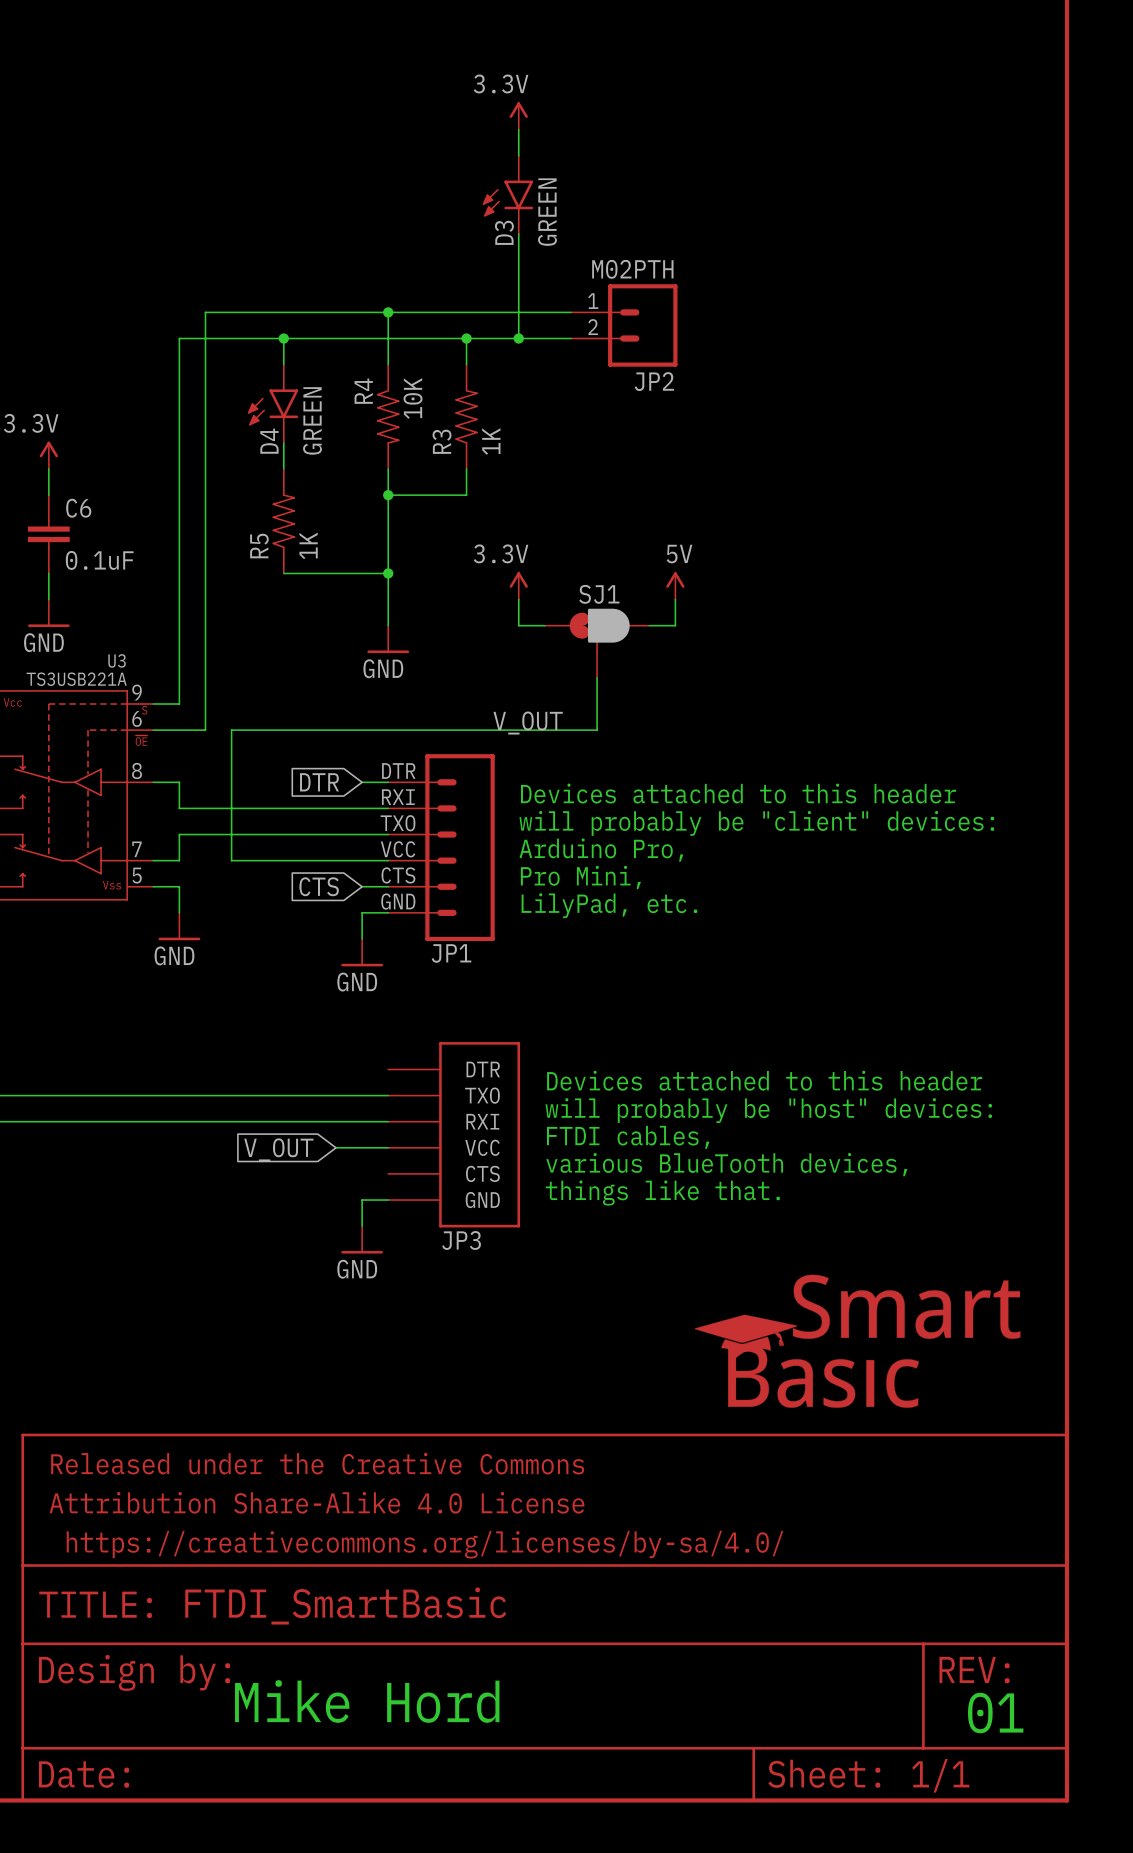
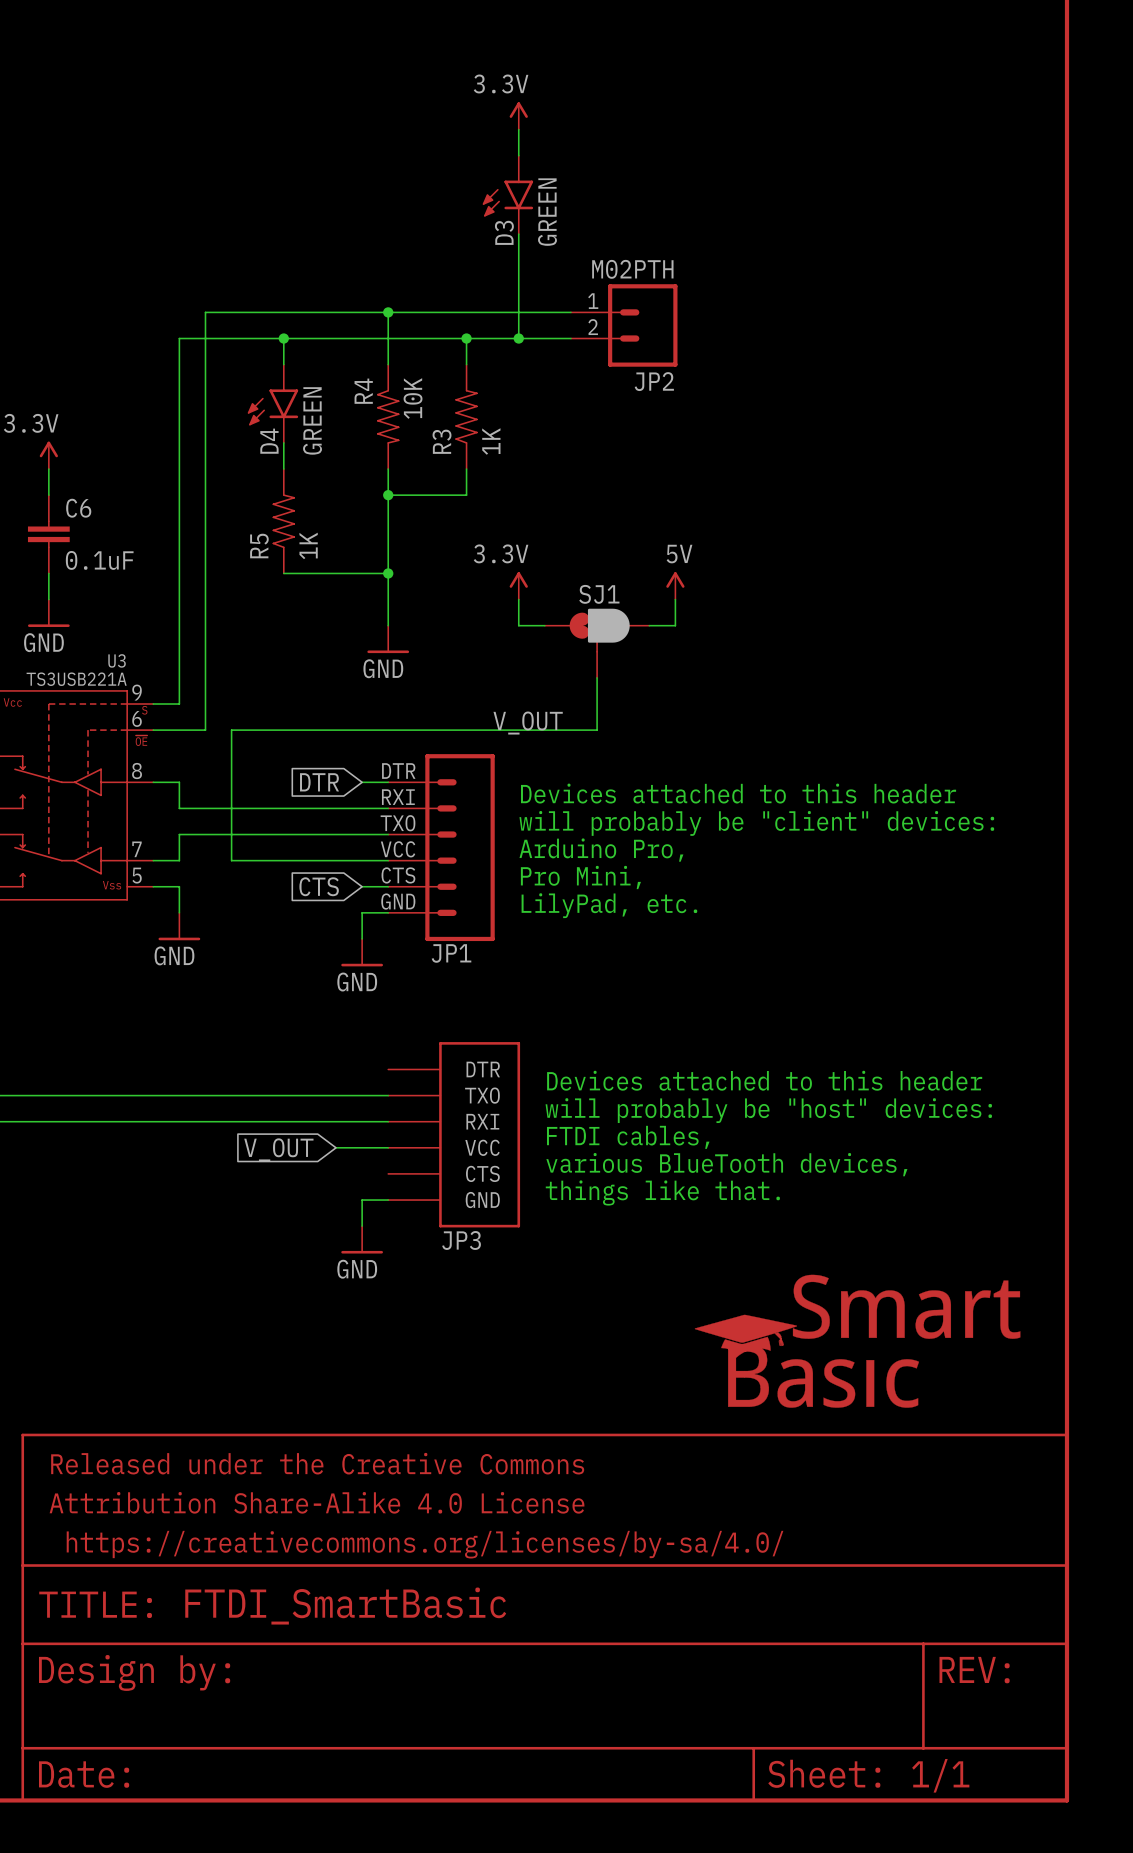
text: Mike Hord (367, 1701) -> none
text: 01 (995, 1713) -> none

